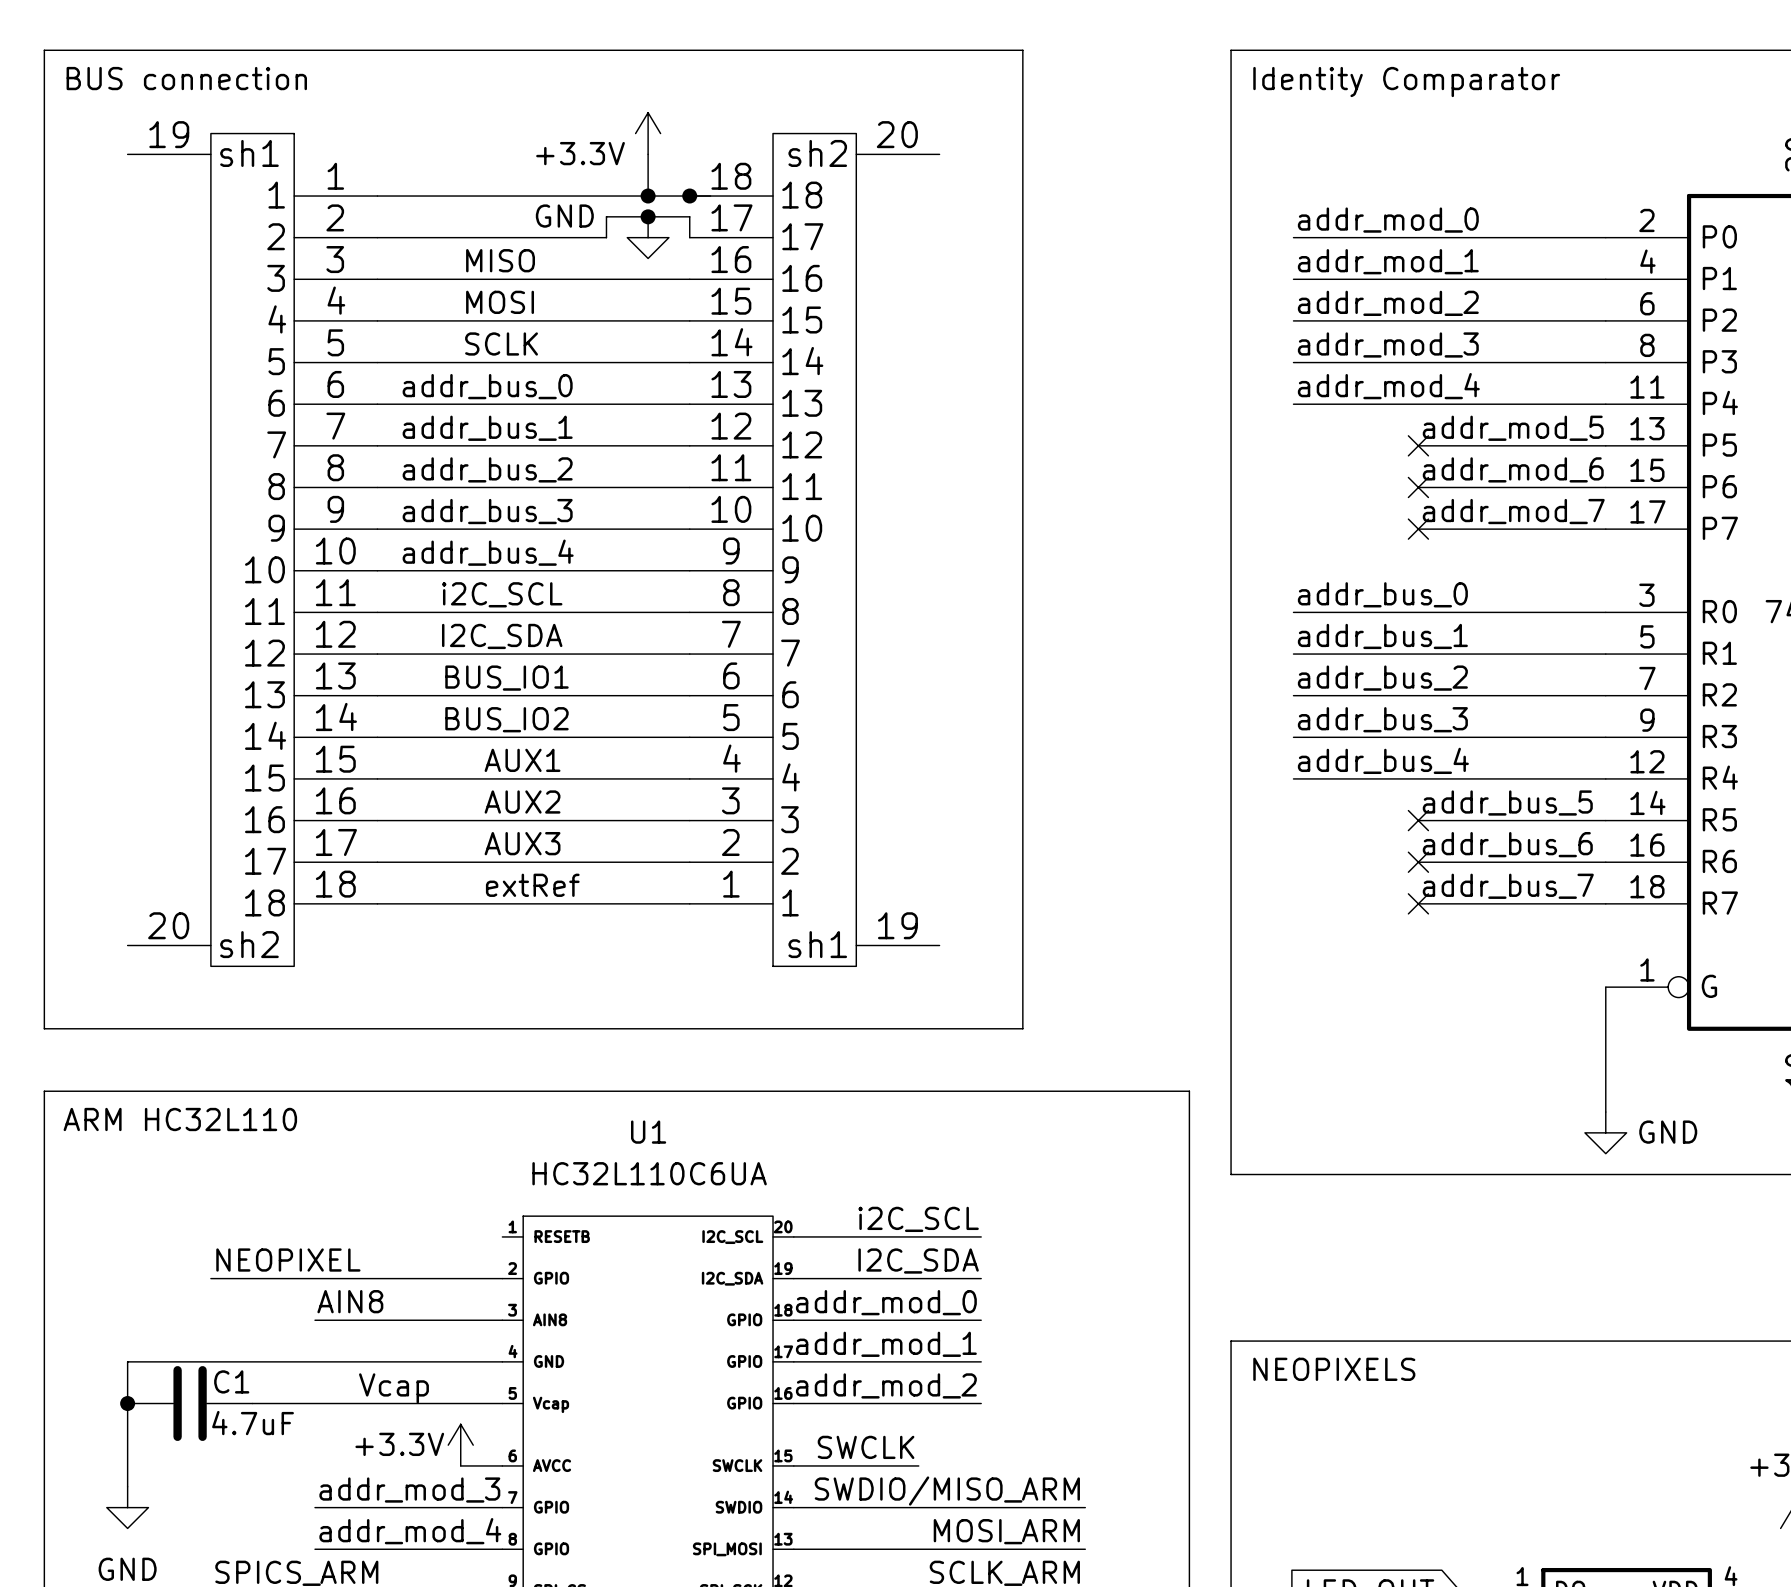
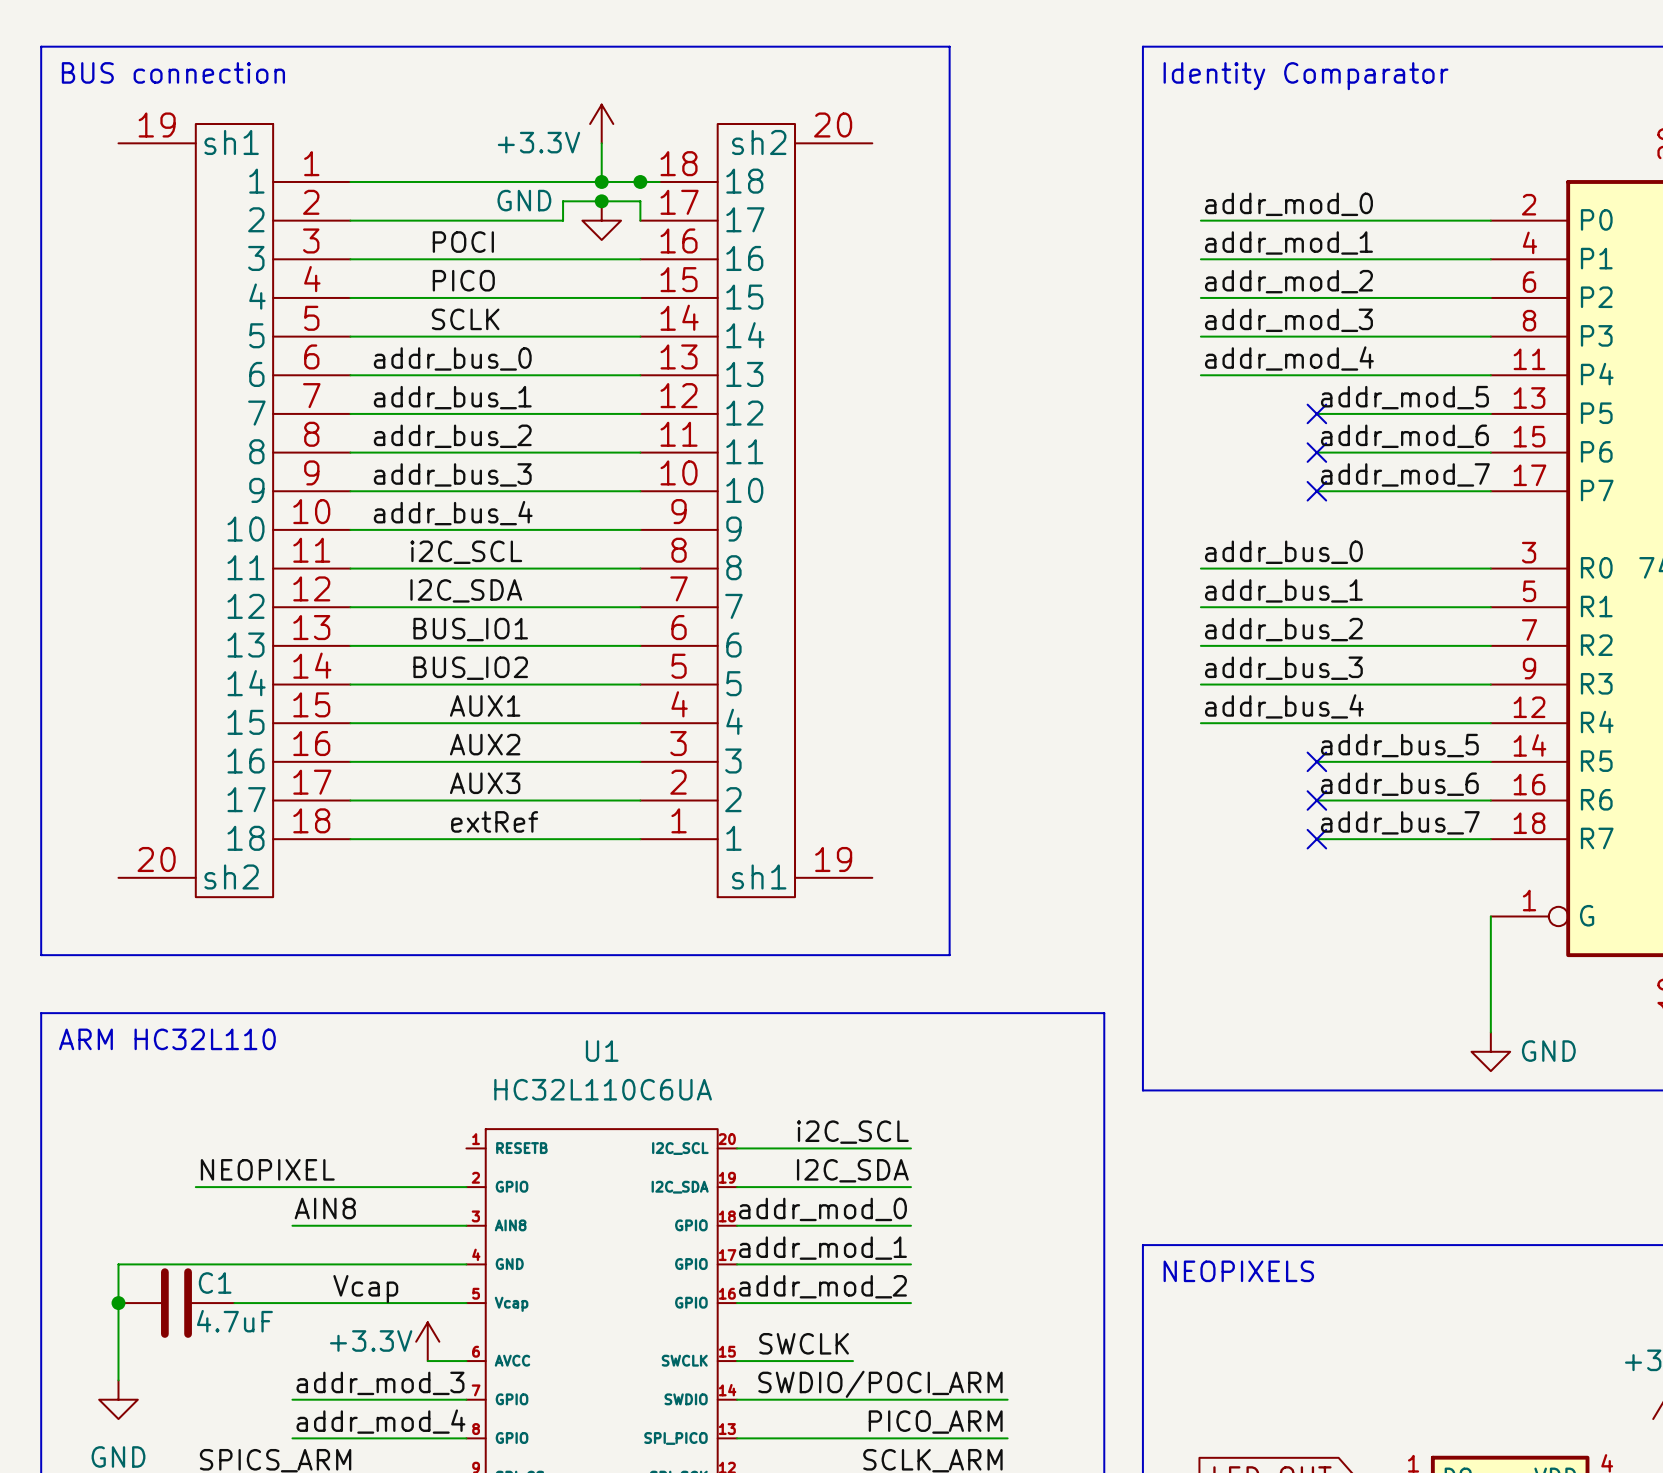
label: MISO (500, 260) -> POCI (463, 242)
label: MOSI (500, 302) -> PICO (463, 280)
label: SWDIO/MISO_ARM (947, 1491) -> SWDIO/POCI_ARM (880, 1384)
label: MOSI_ARM (1006, 1531) -> PICO_ARM (935, 1422)
U1 pin name: SPI_MOSI (727, 1549) -> SPI_PICO (675, 1438)

